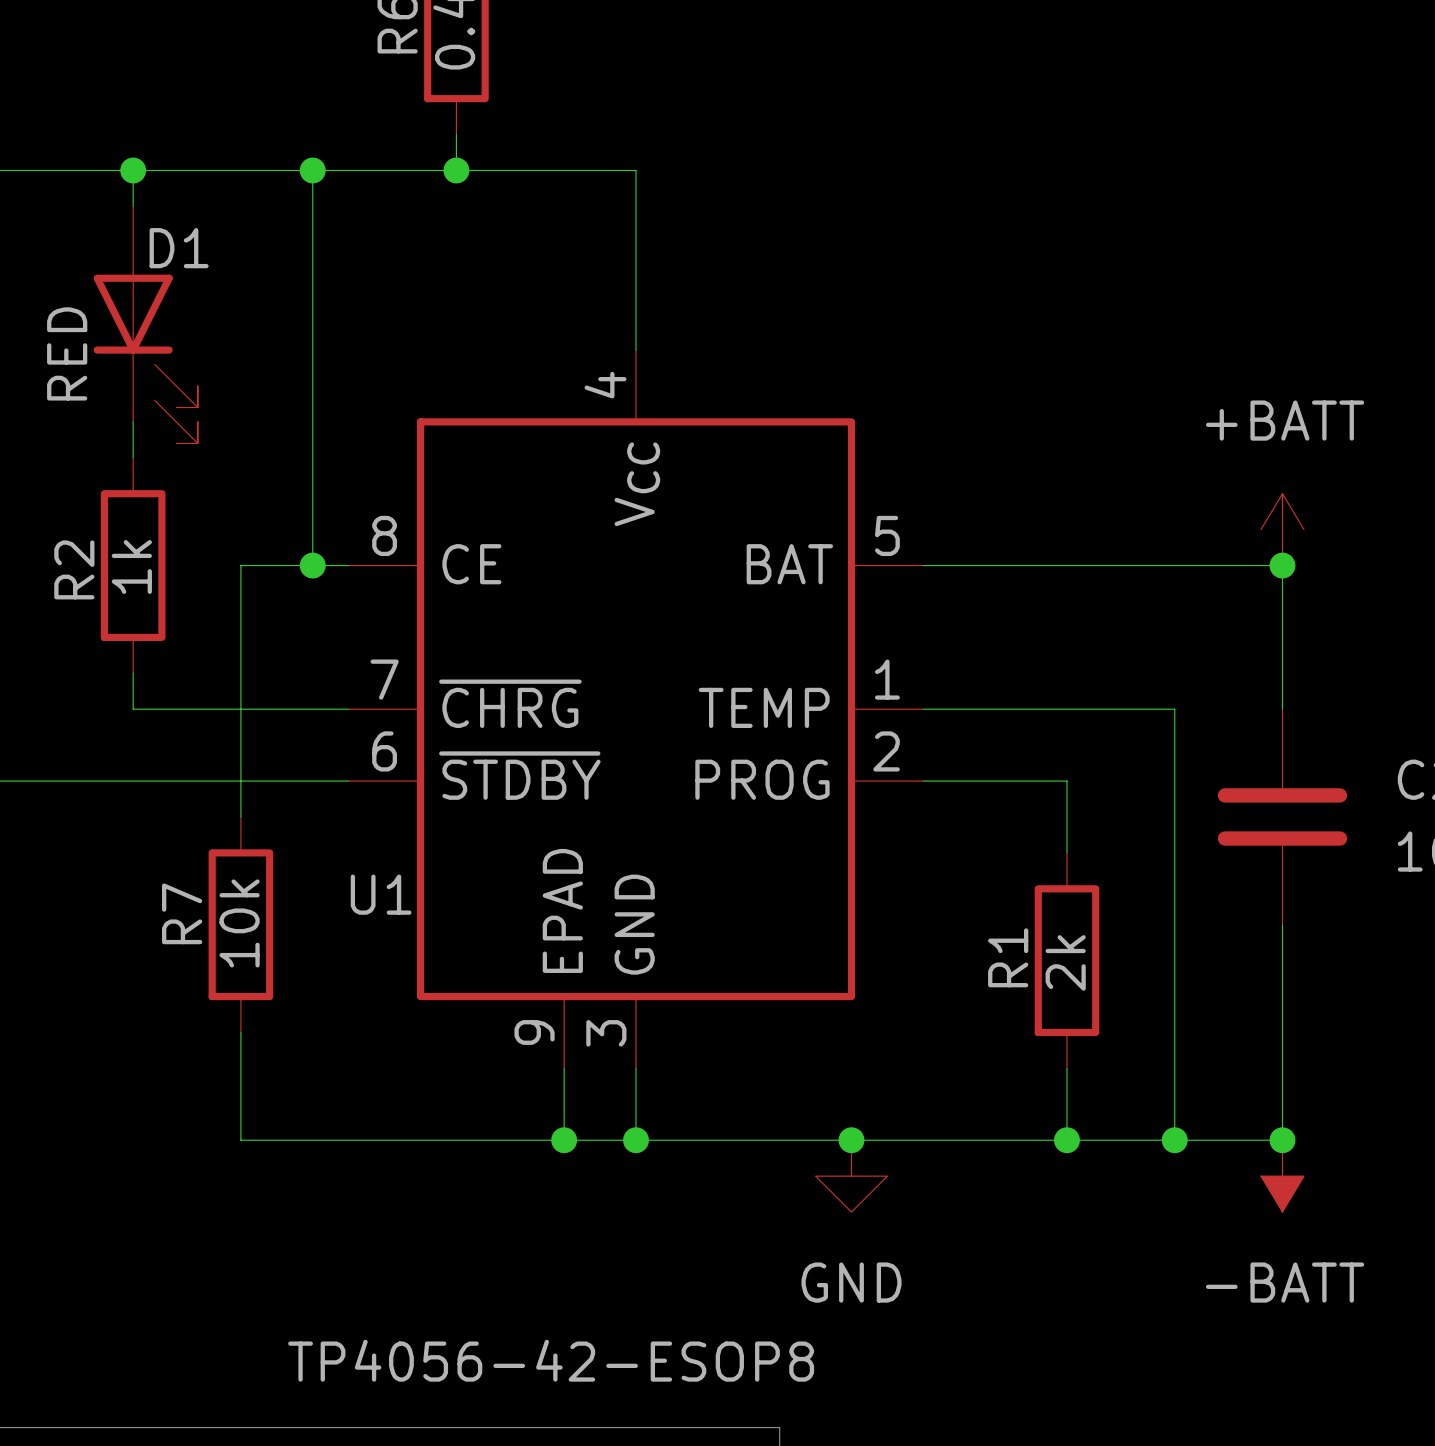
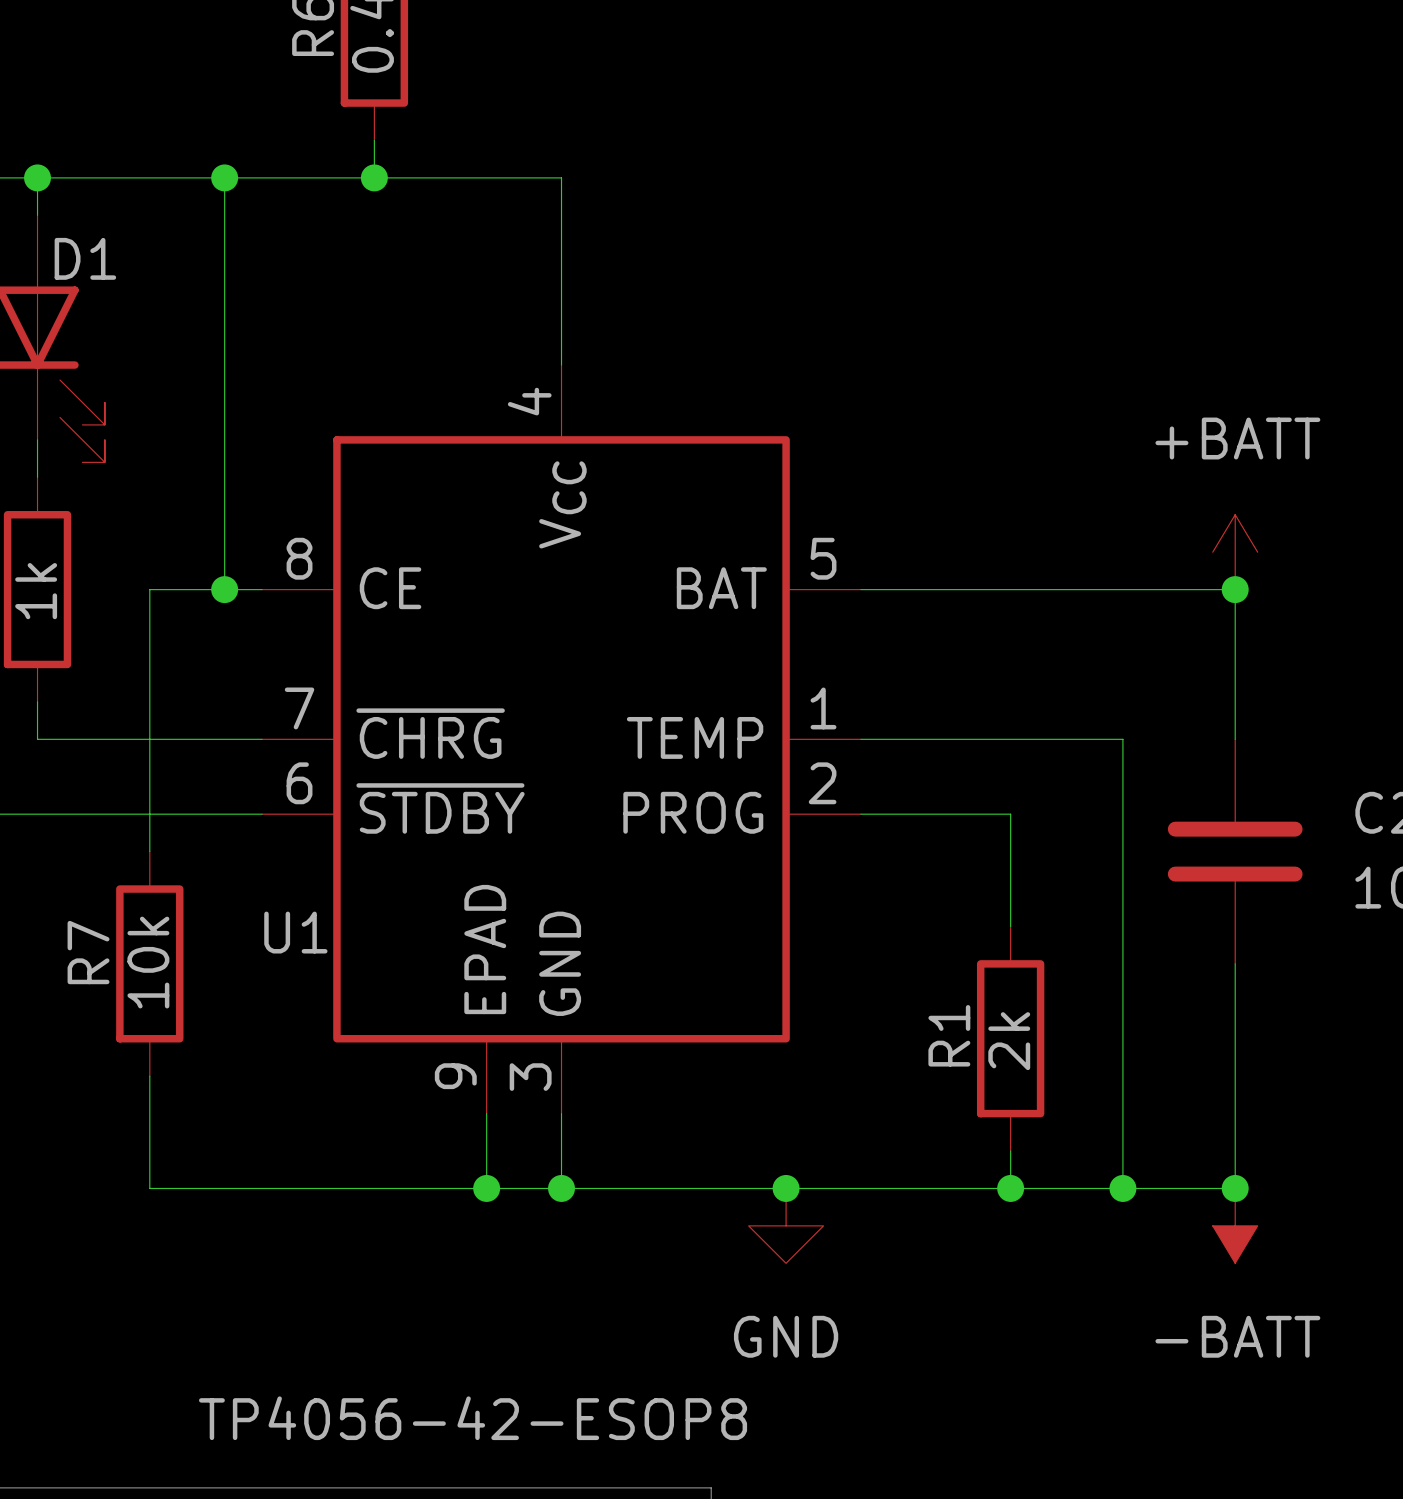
R1 position: (1067, 960) -> (1010, 1038)

